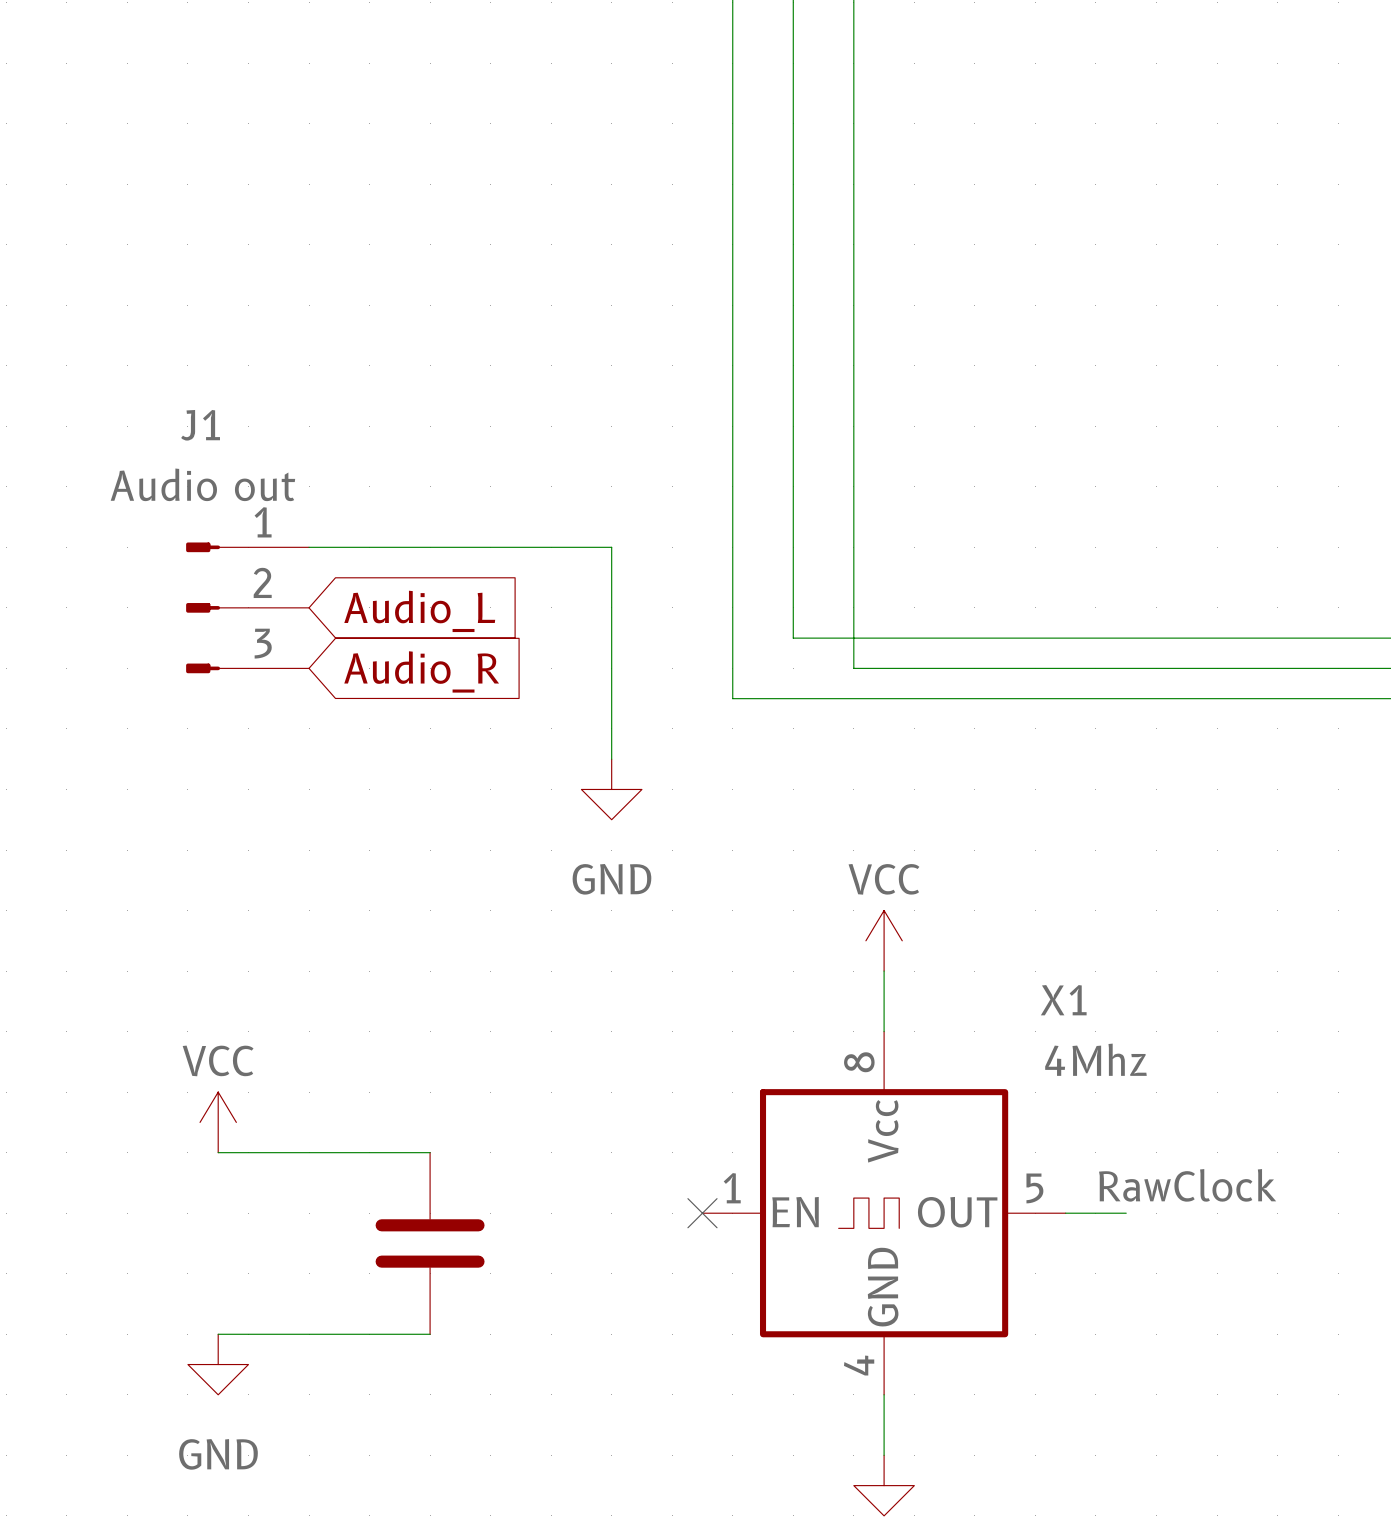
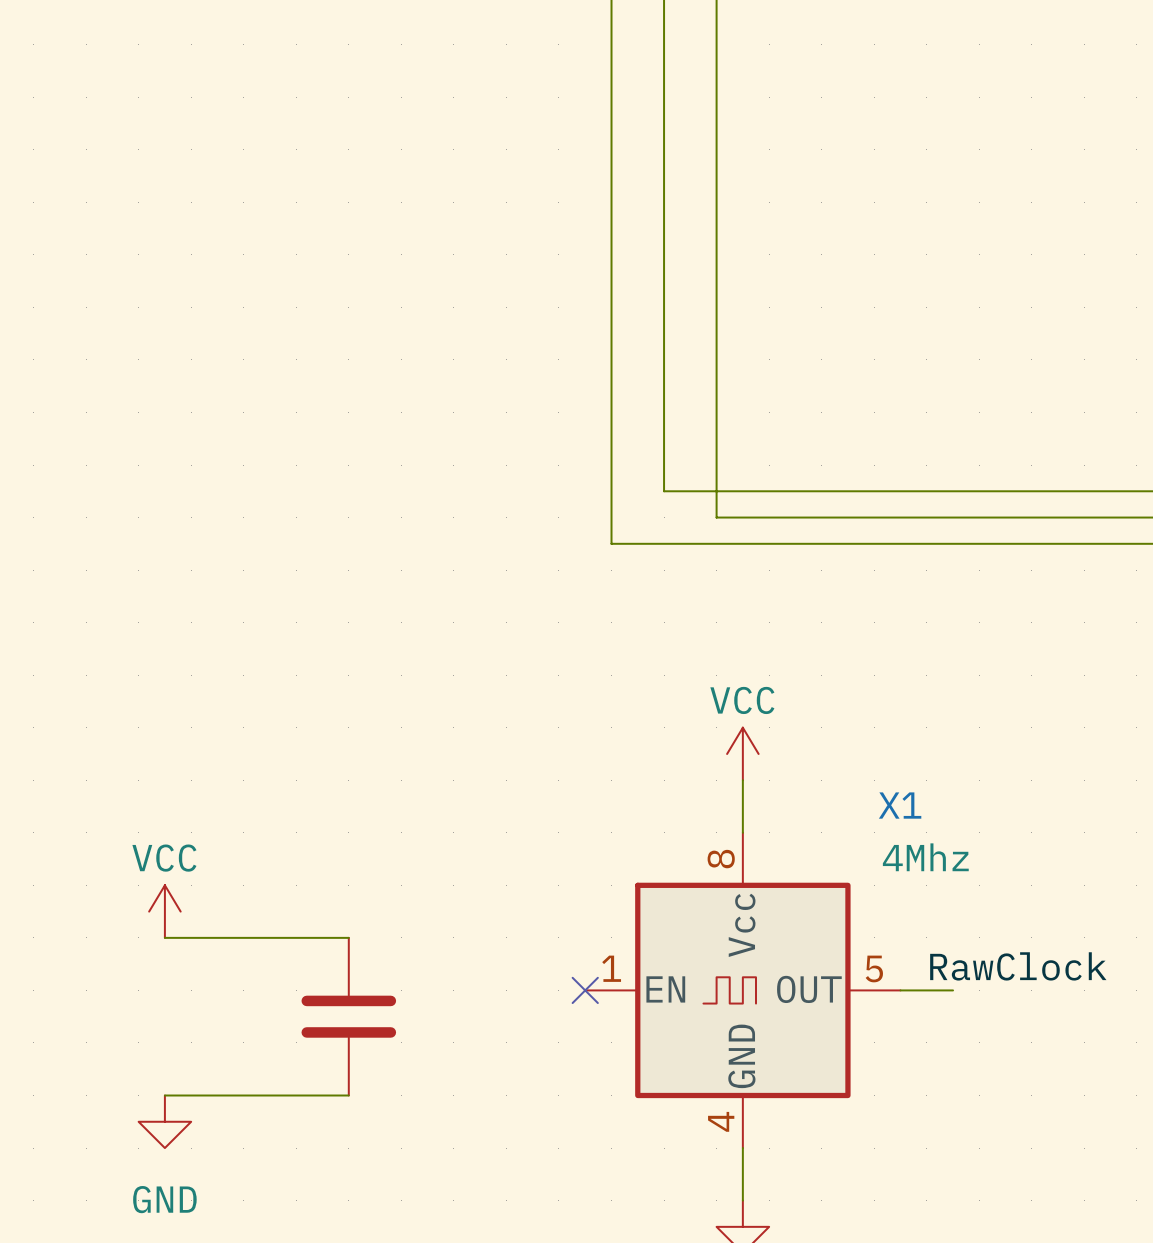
wire: (309, 547) (611, 547) (611, 759) -> none
J1: Audio out (247, 607) -> none
global label: Audio_L (419, 611) -> none
global label: Audio_R (421, 671) -> none
power symbol: GND (611, 789) -> none

